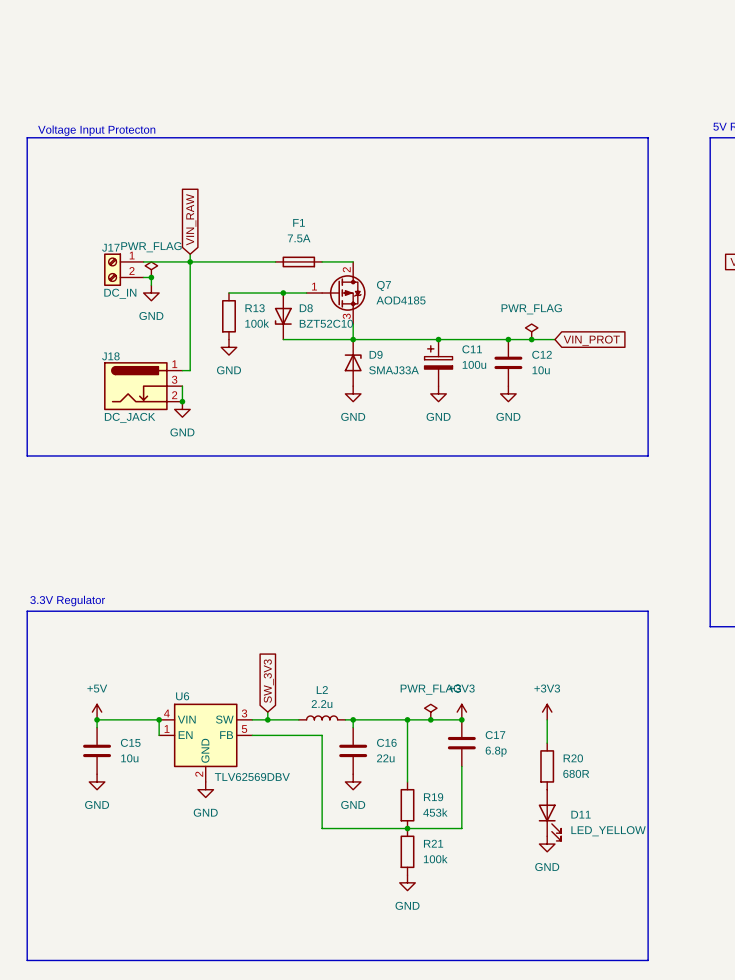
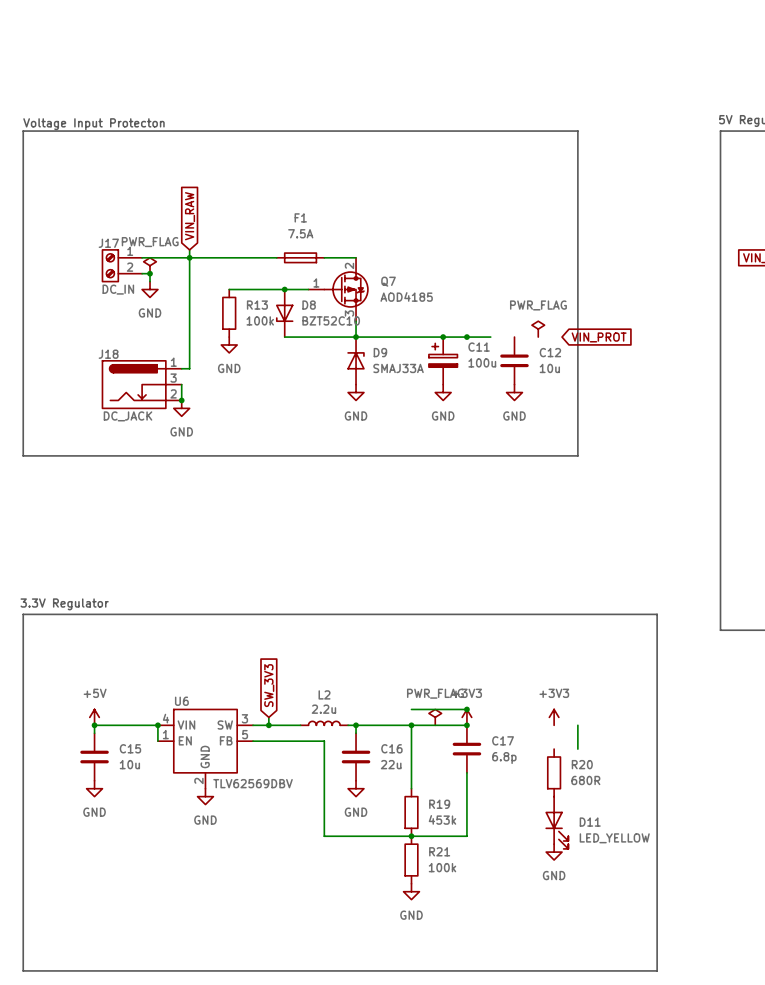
line: (570, 137) (648, 137) (648, 455) (570, 455) -> (577, 131) (577, 455)
junction: none -> (466, 337)
wire: (485, 339) (554, 339) -> none
junction: (508, 339) -> none
junction: (531, 339) -> none
wire: none -> (411, 709) (466, 709)
junction position: (430, 719) -> (466, 709)
wire: (547, 719) (547, 743) -> (577, 725) (577, 749)

